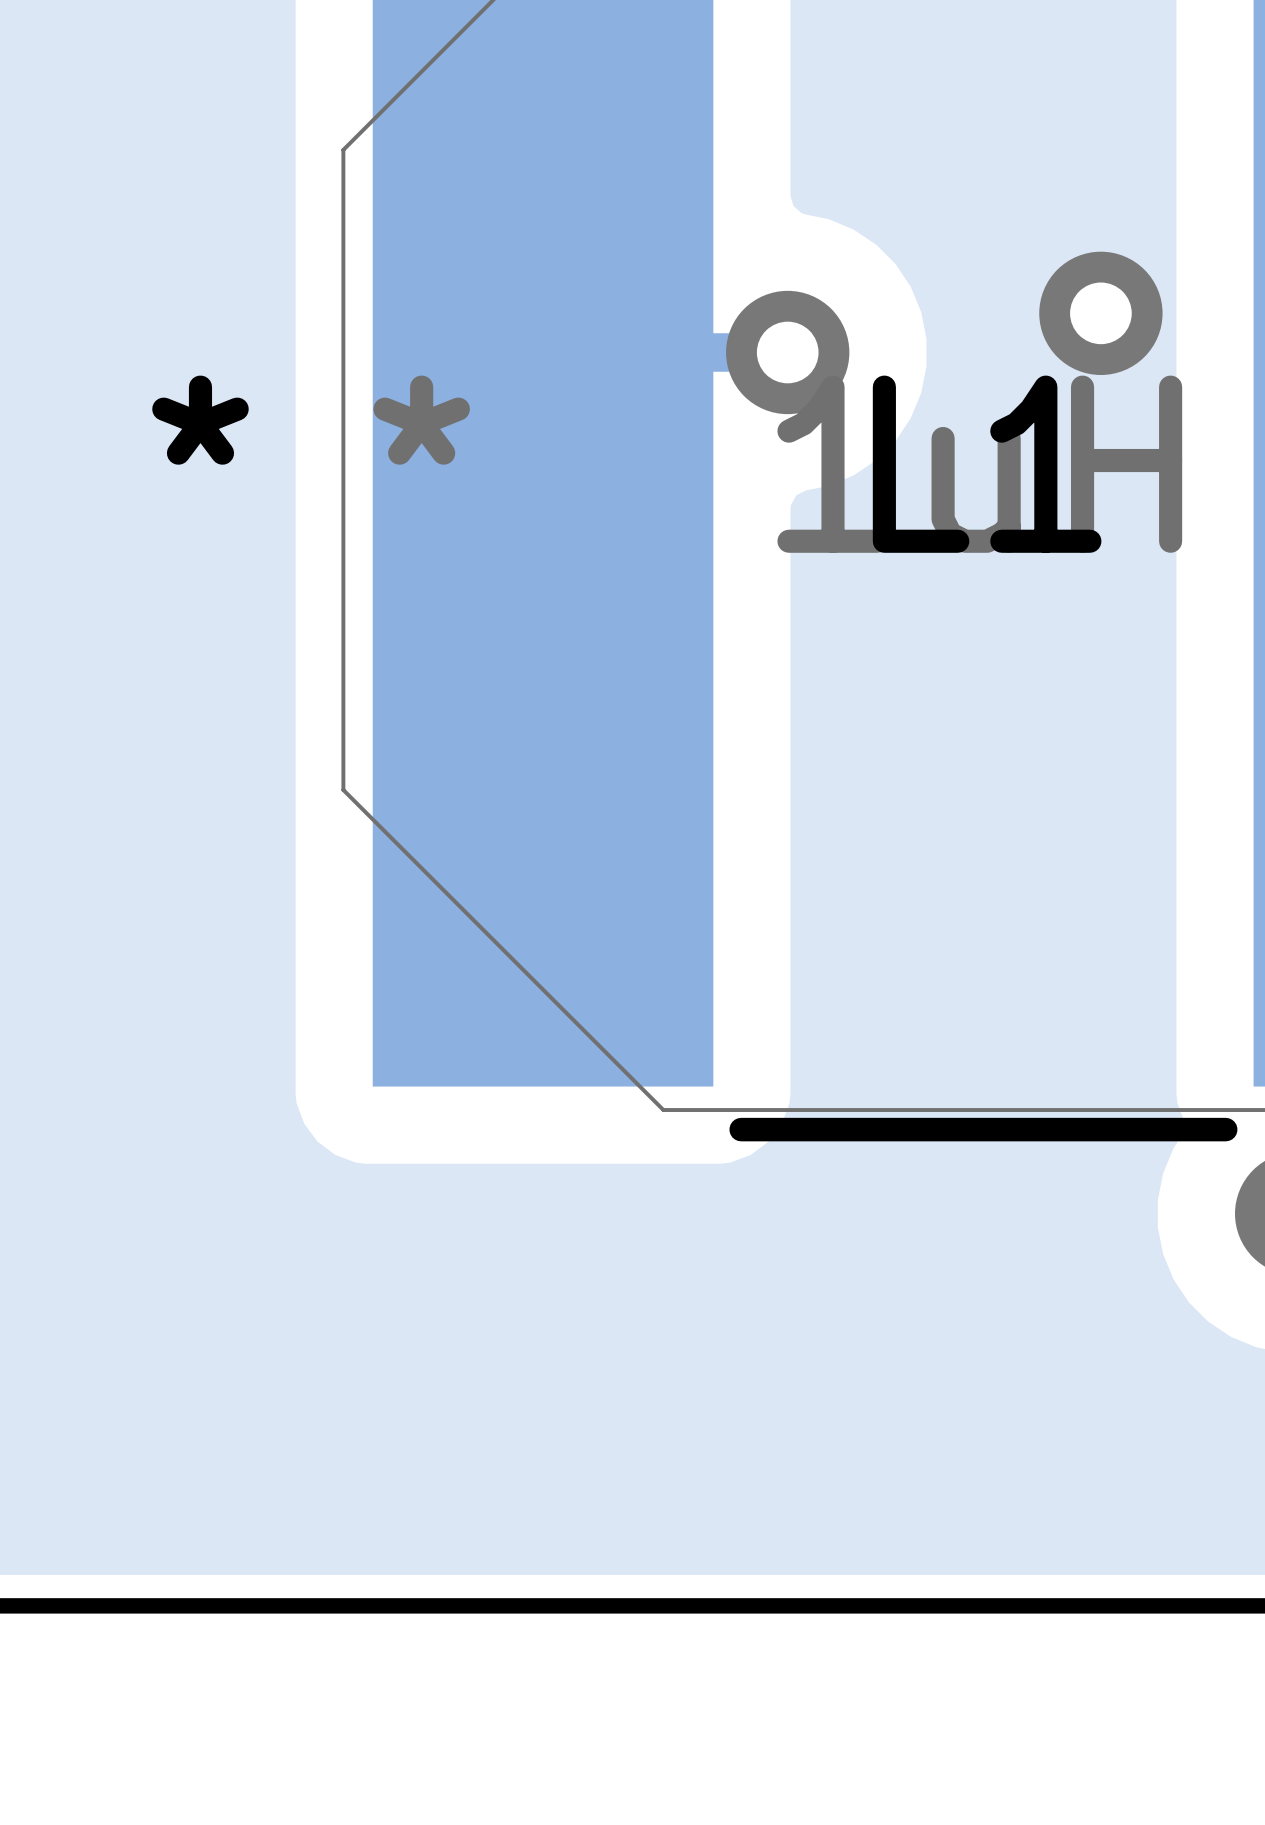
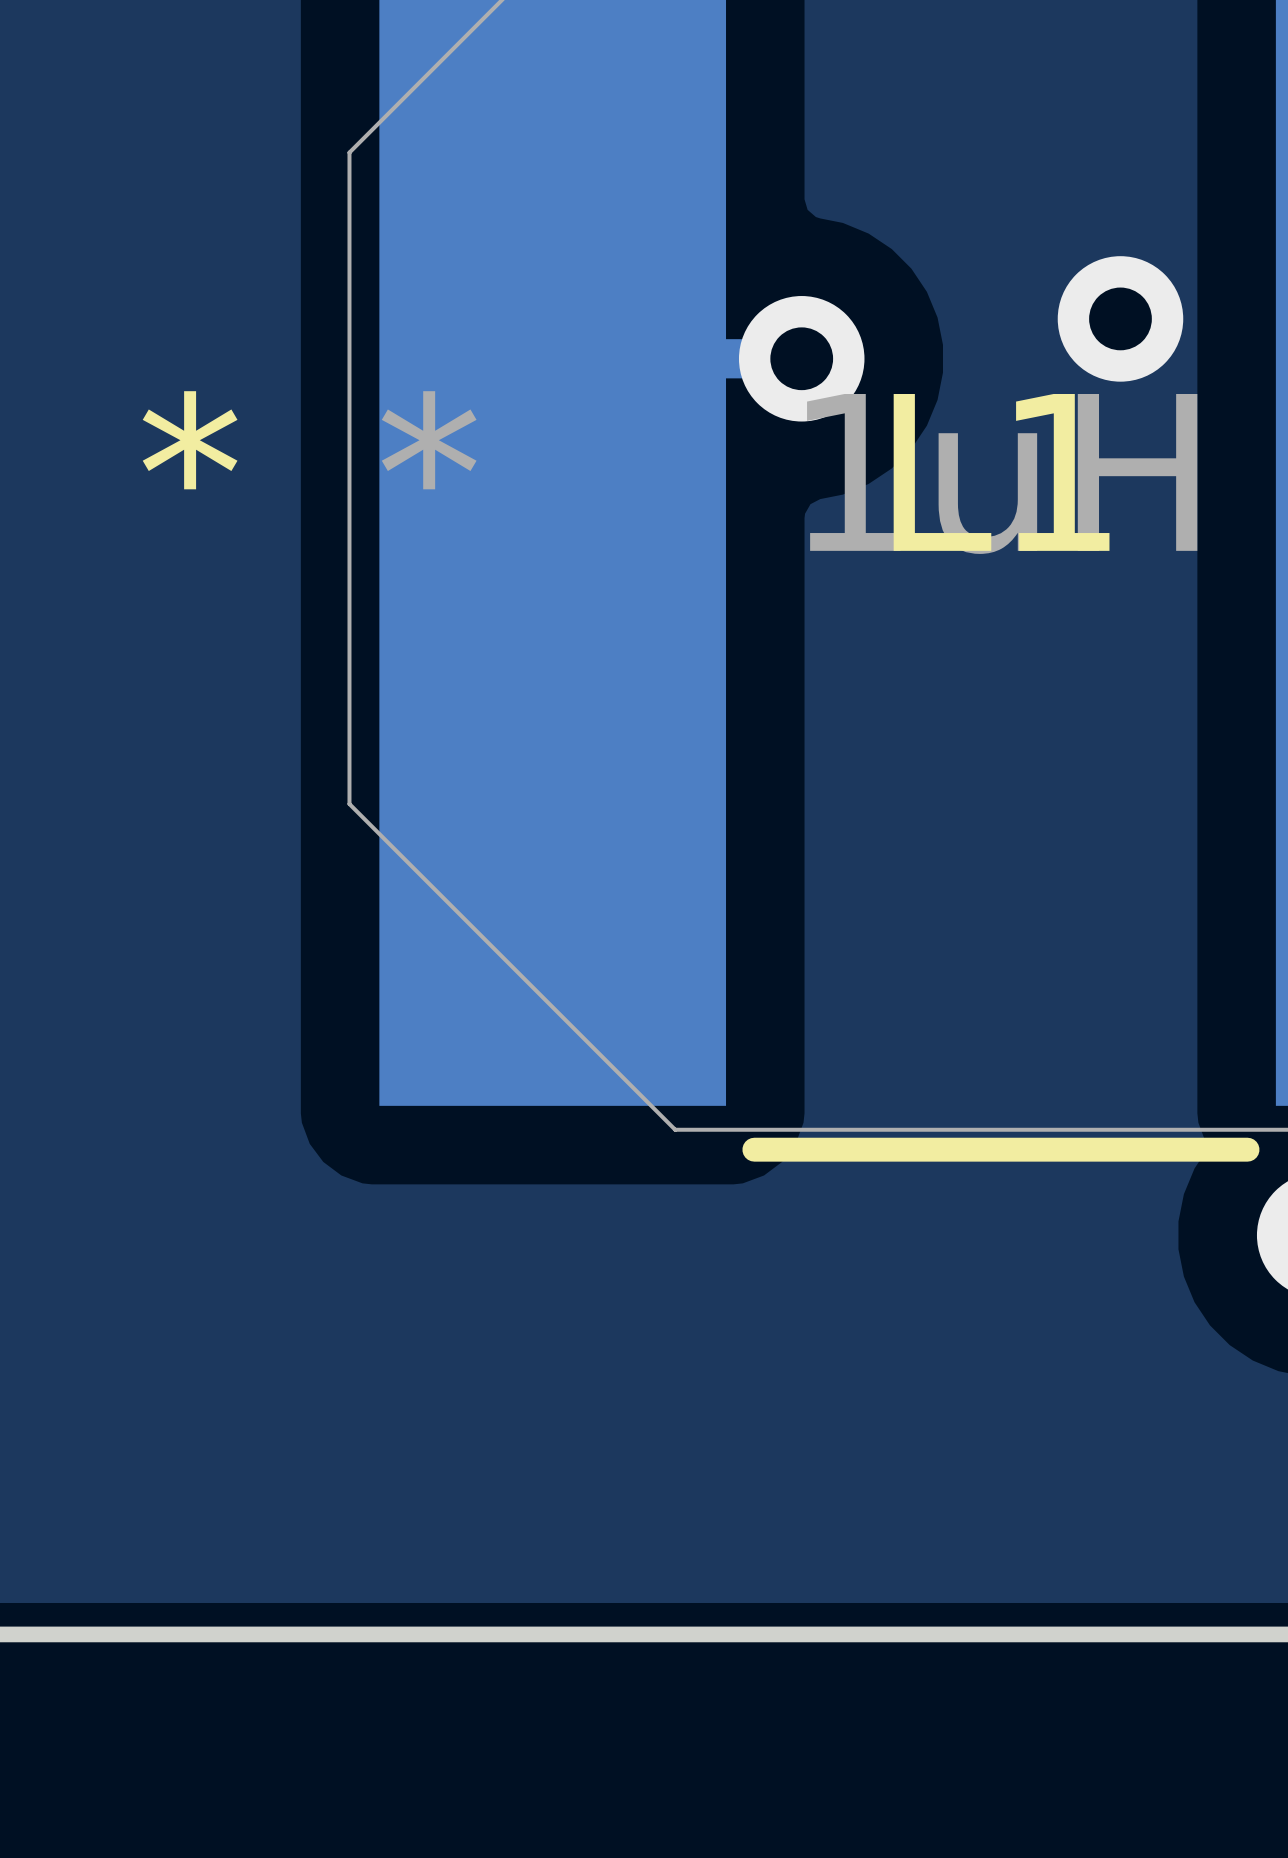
L1 text position: * (200, 420) -> * (190, 440)

